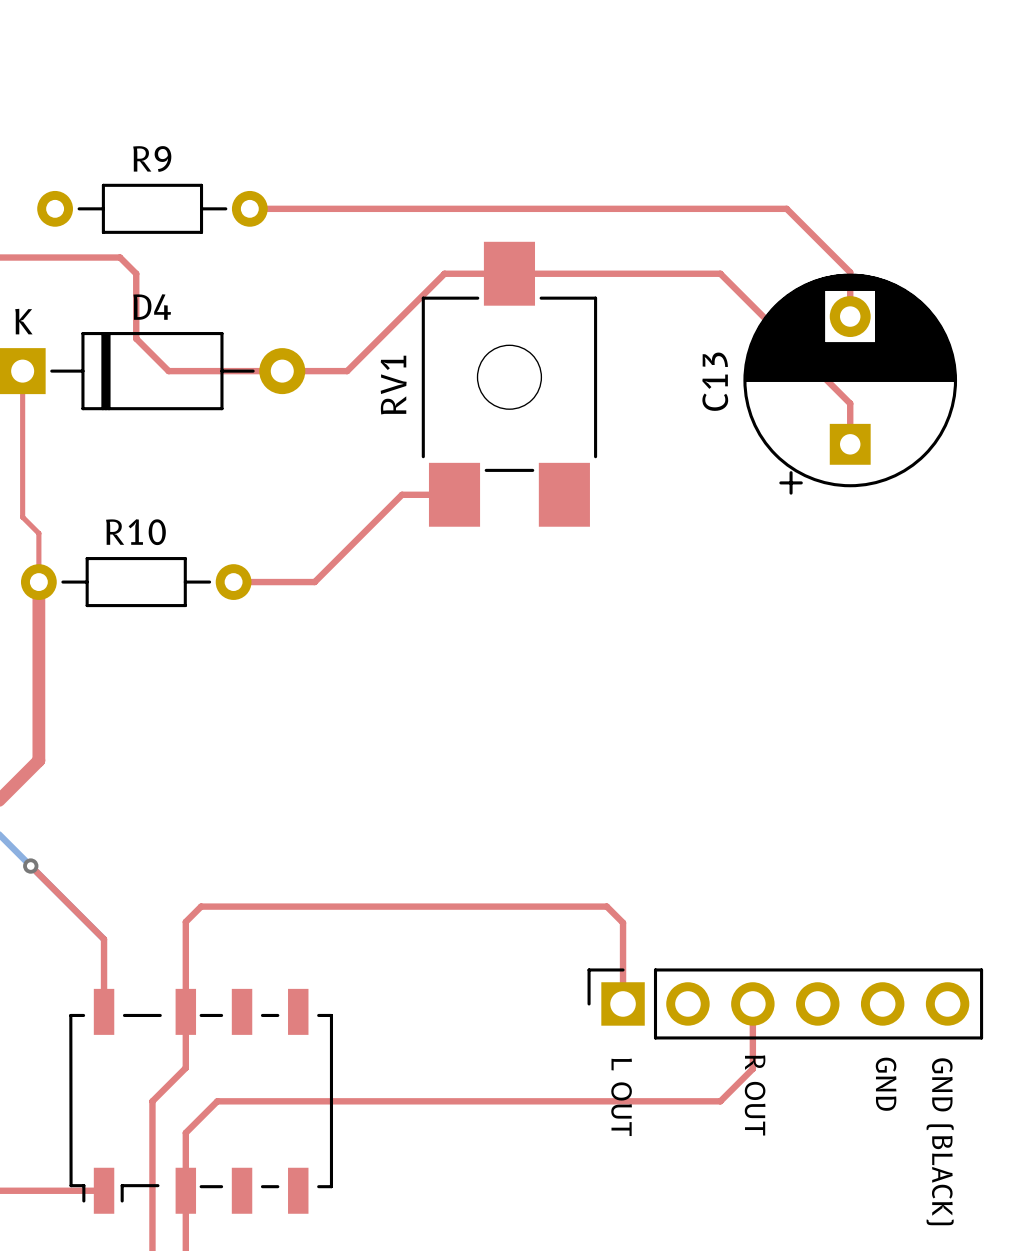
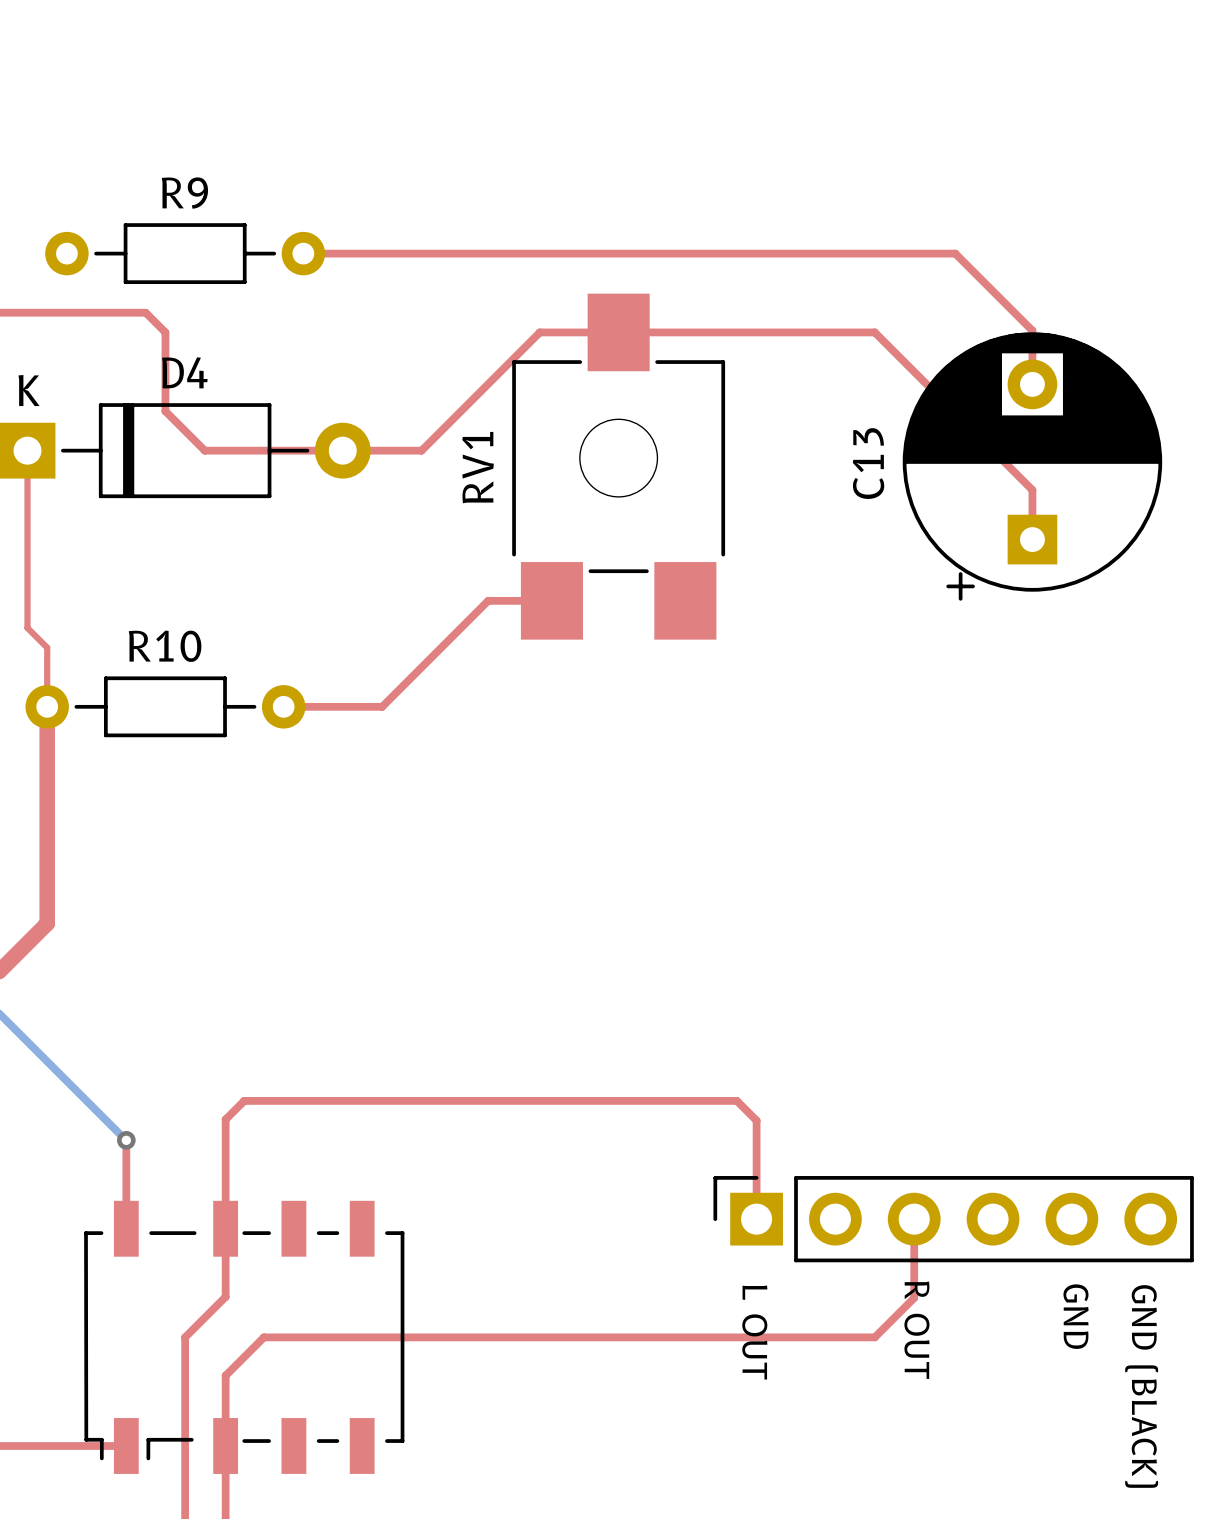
top track: (30, 866) (104, 939) -> none
via position: (30, 866) -> (126, 1140)

